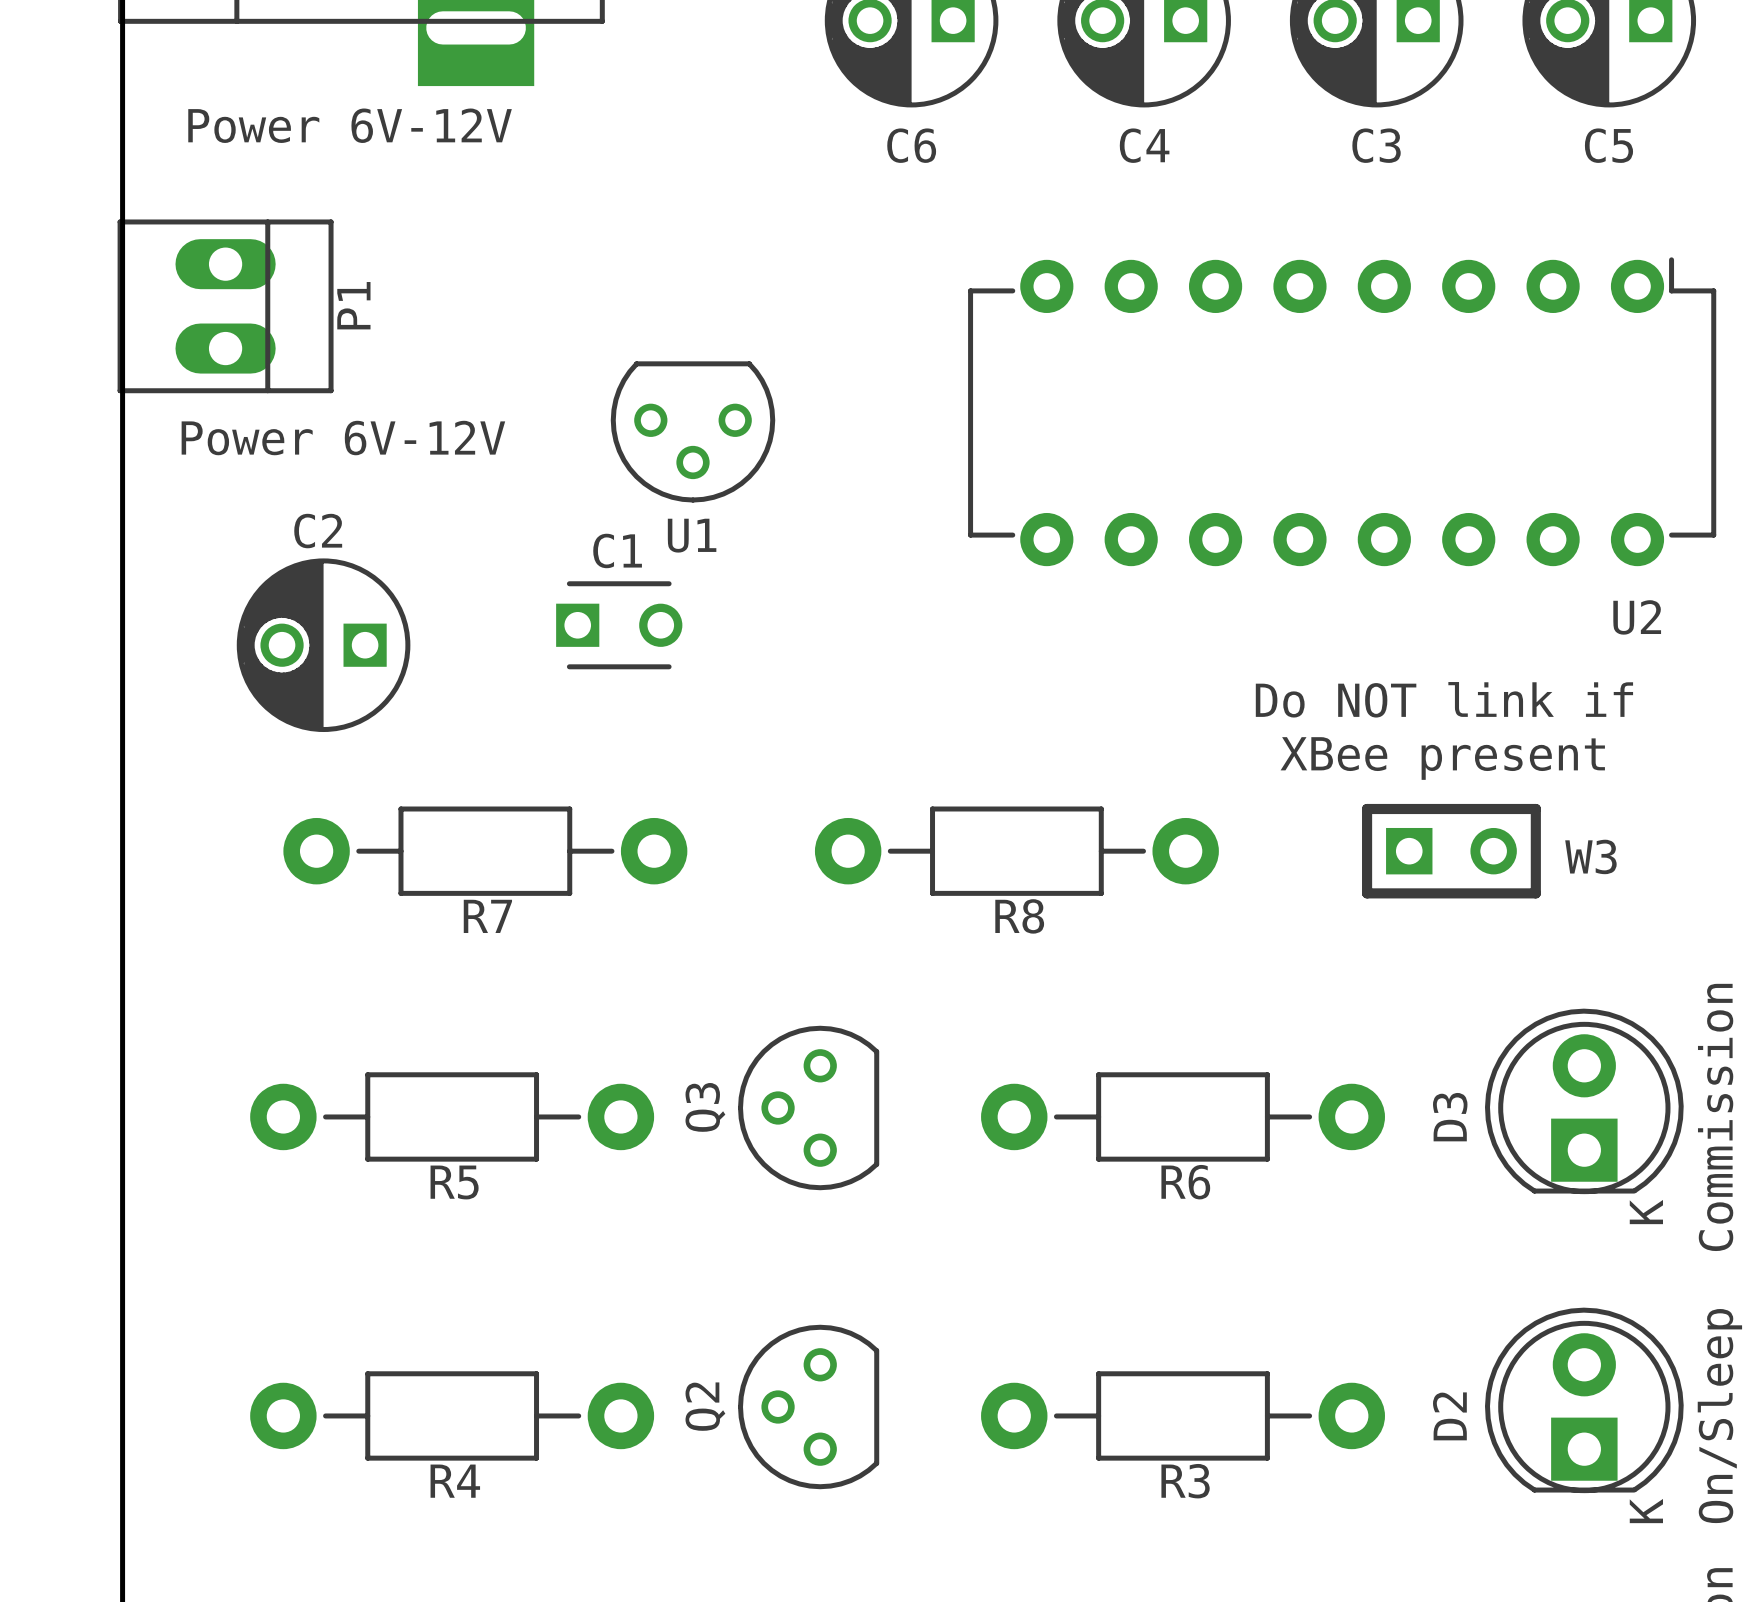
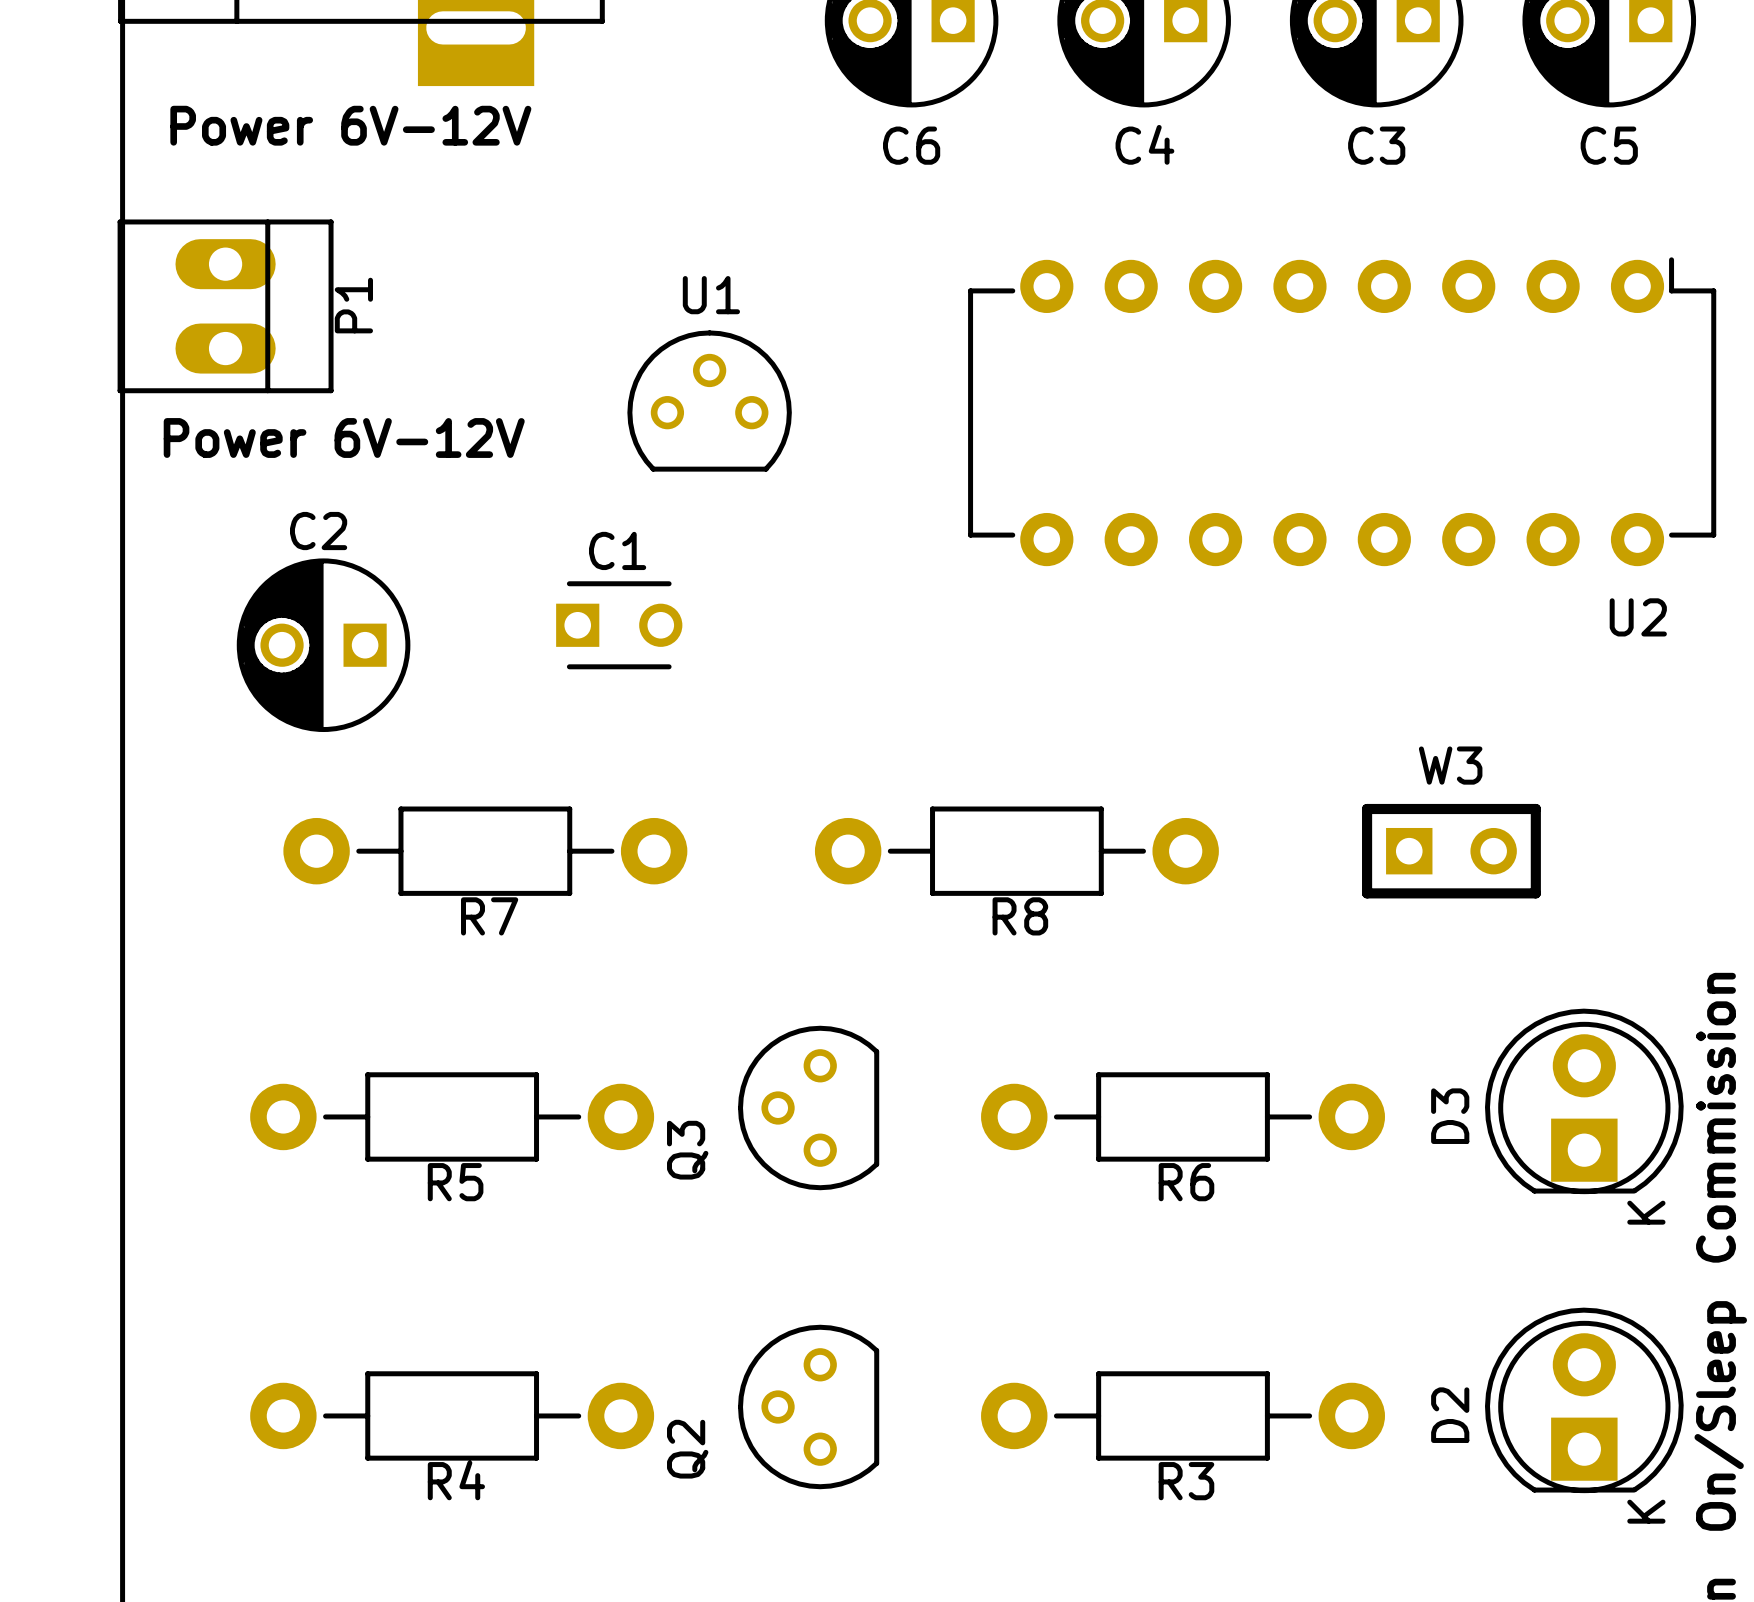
U1 rotation: 0° (693, 431) -> 180° (709, 401)
text: Do NOT link if (1444, 699) -> none
text: XBee present (1442, 758) -> none
W3 name position: W3 (1590, 856) -> W3 (1450, 765)
Q3 name position: Q3 (705, 1107) -> Q3 (687, 1150)
Q2 name position: Q2 (705, 1406) -> Q2 (687, 1449)

